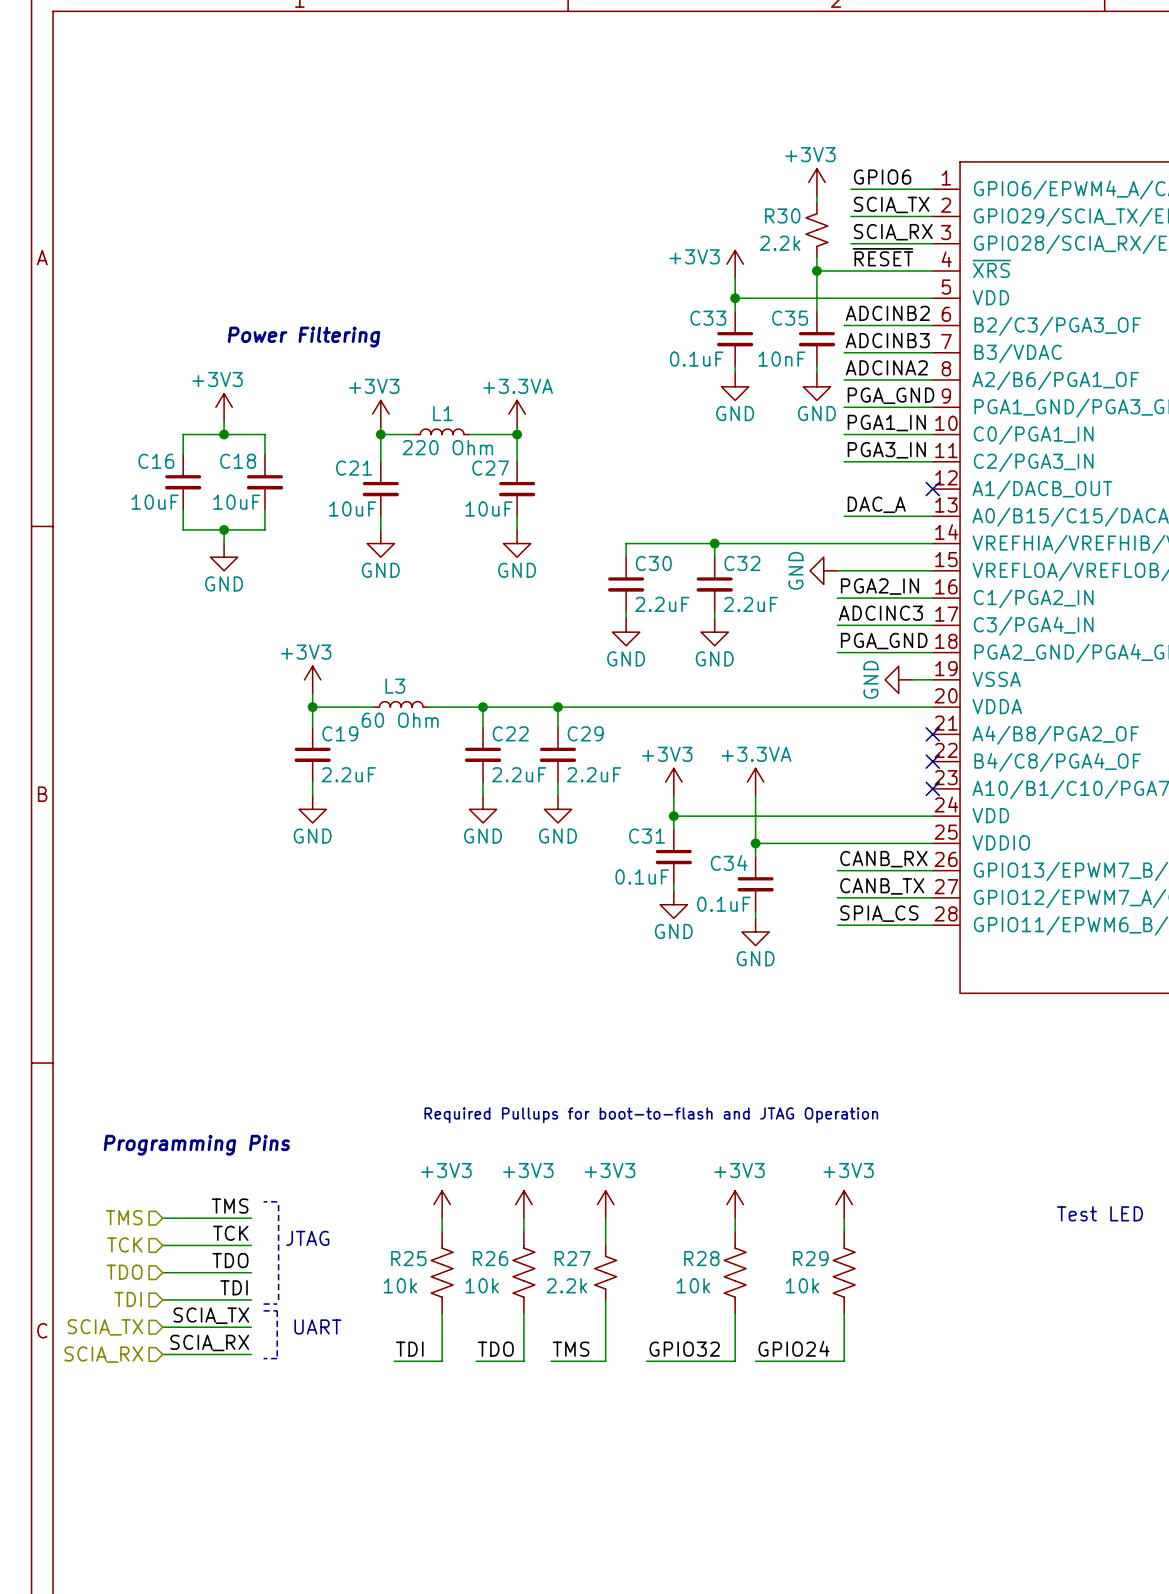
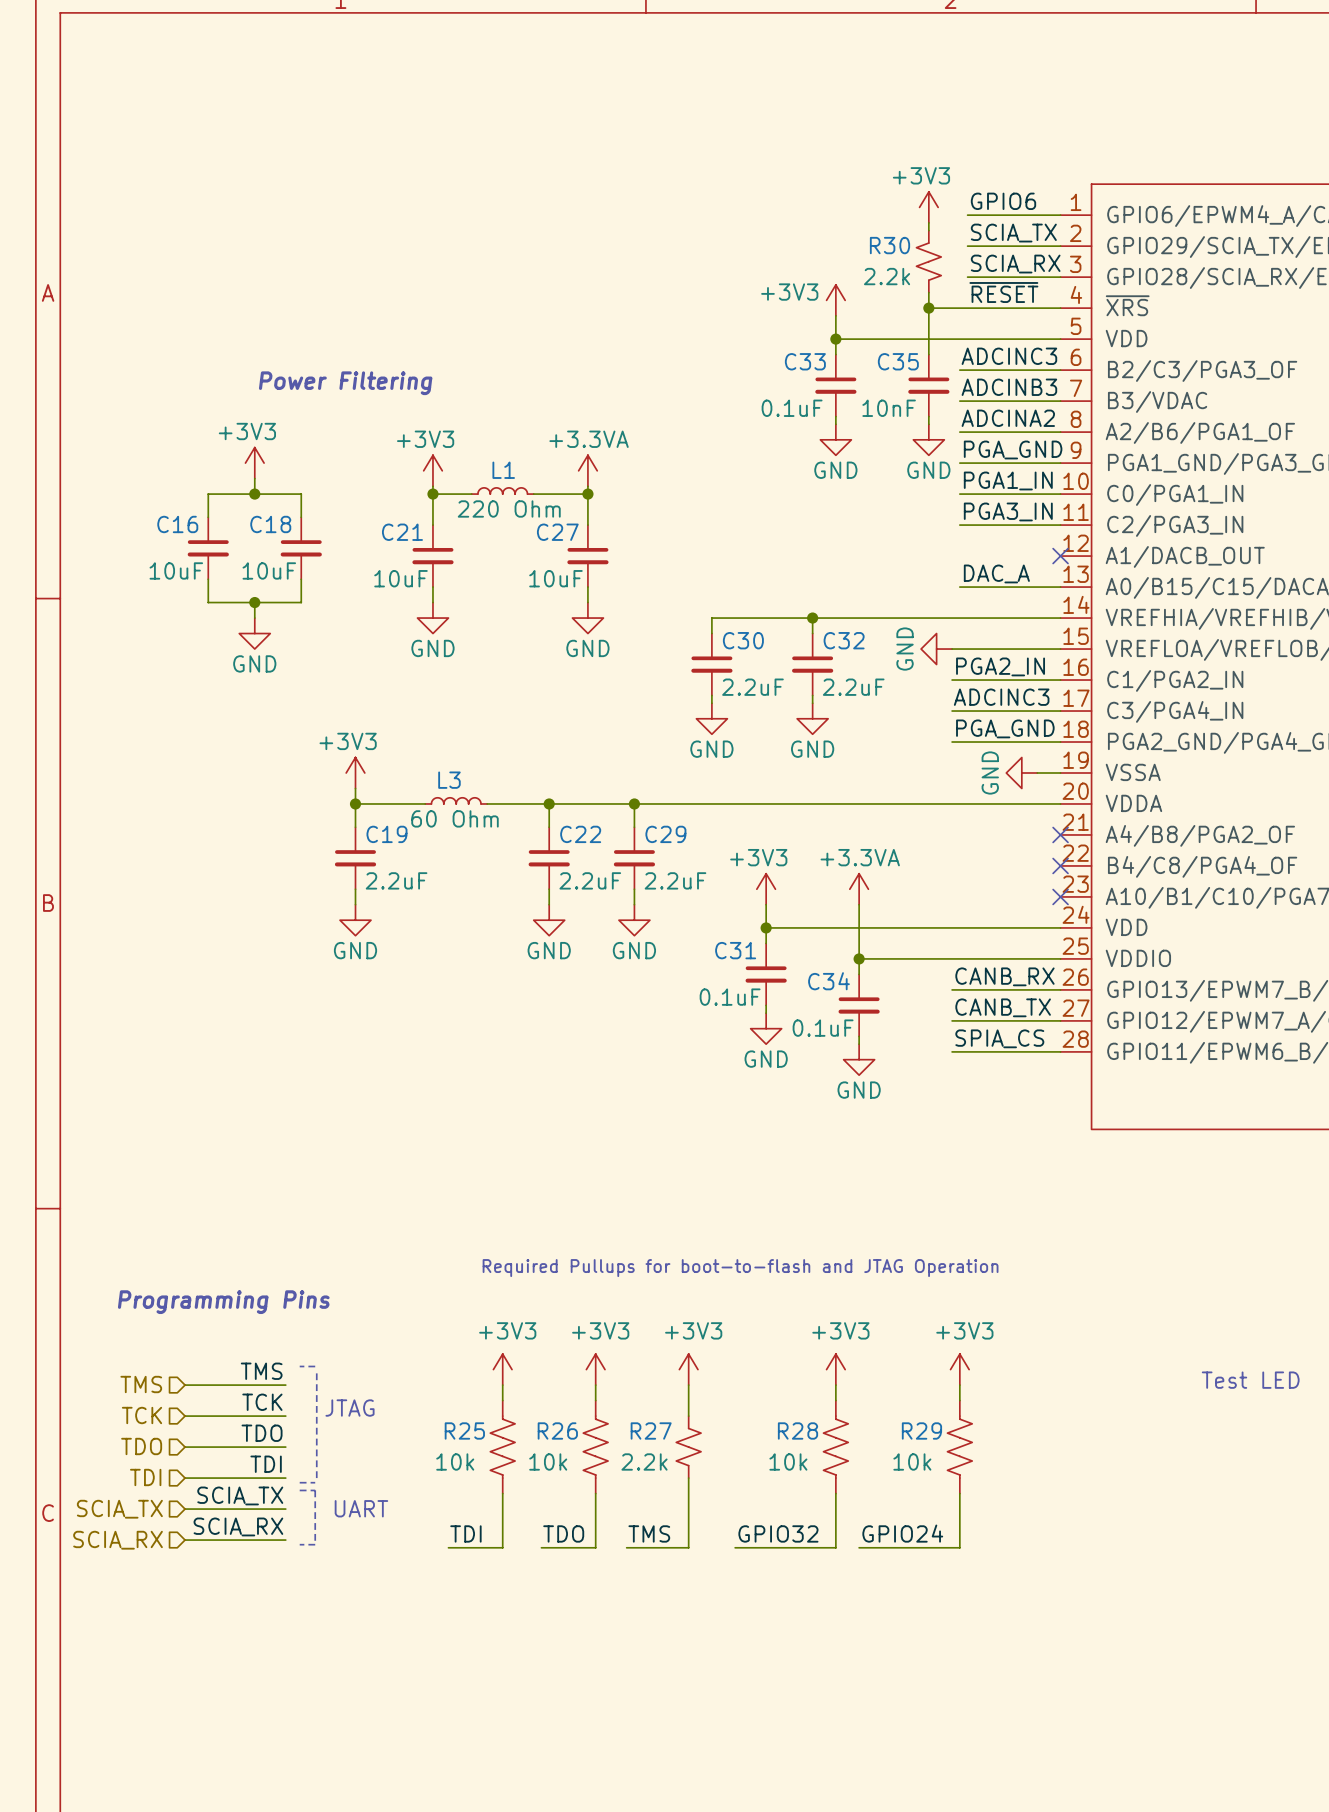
label: ADCINB2 (887, 313) -> ADCINC3 (1009, 356)

